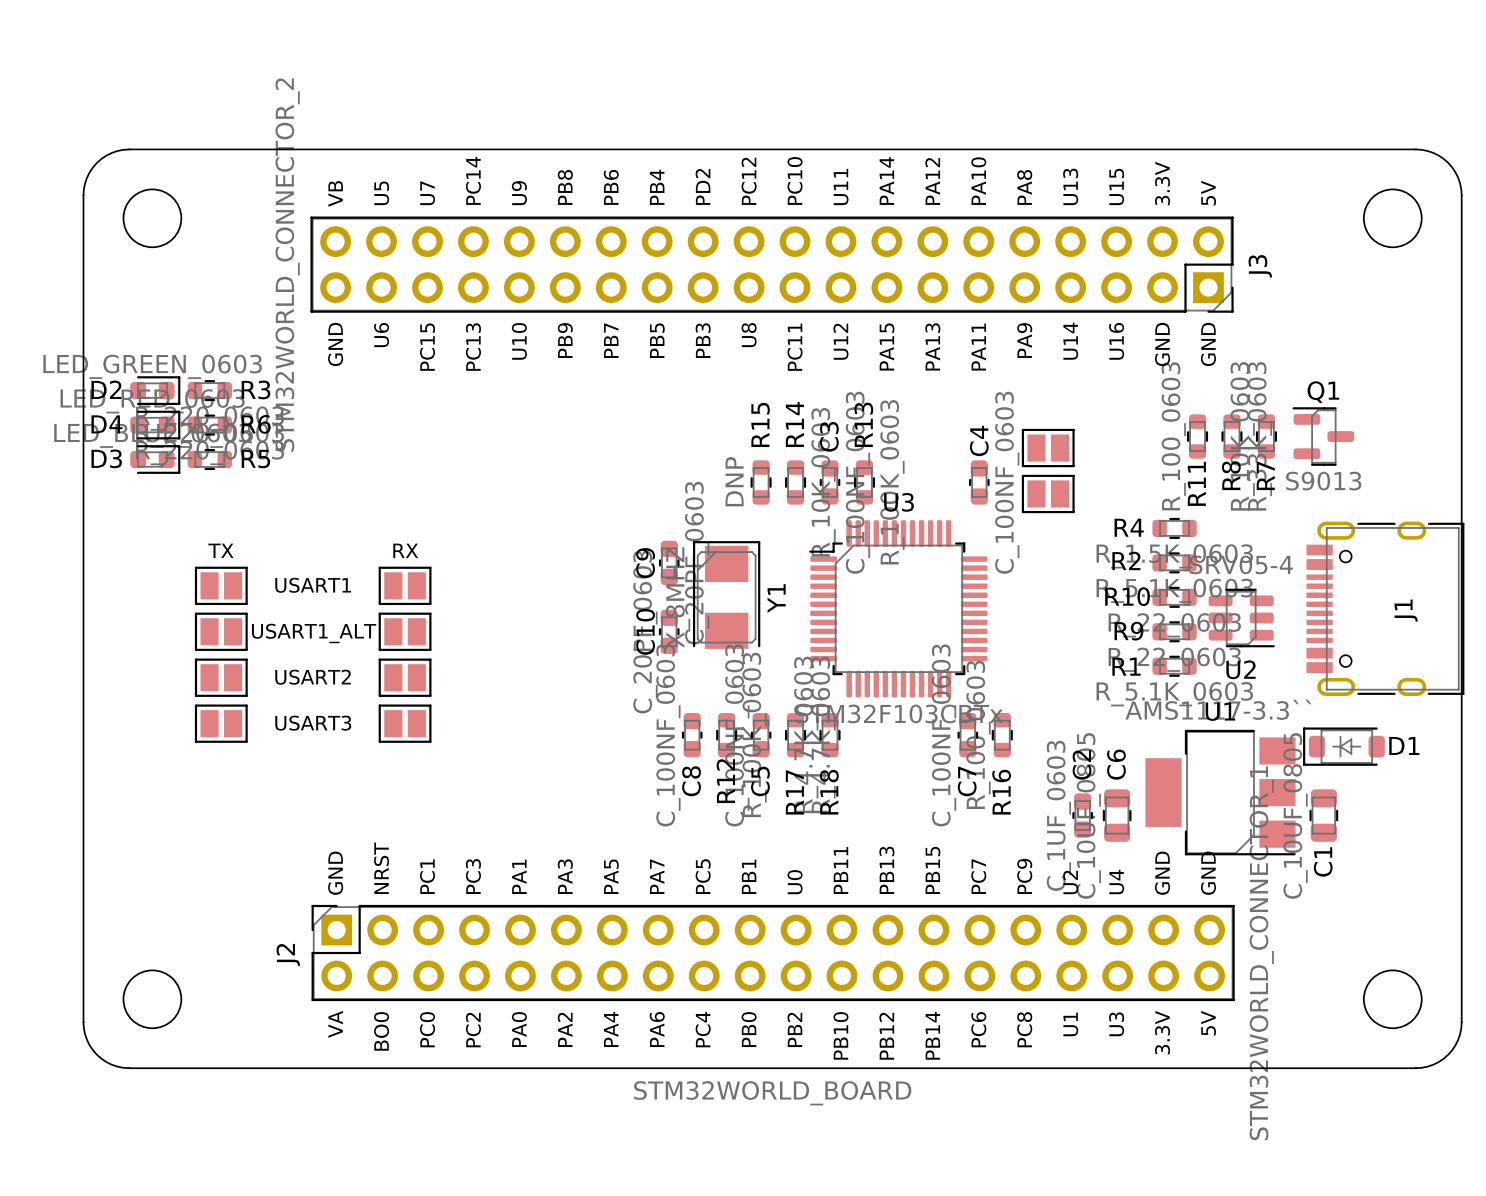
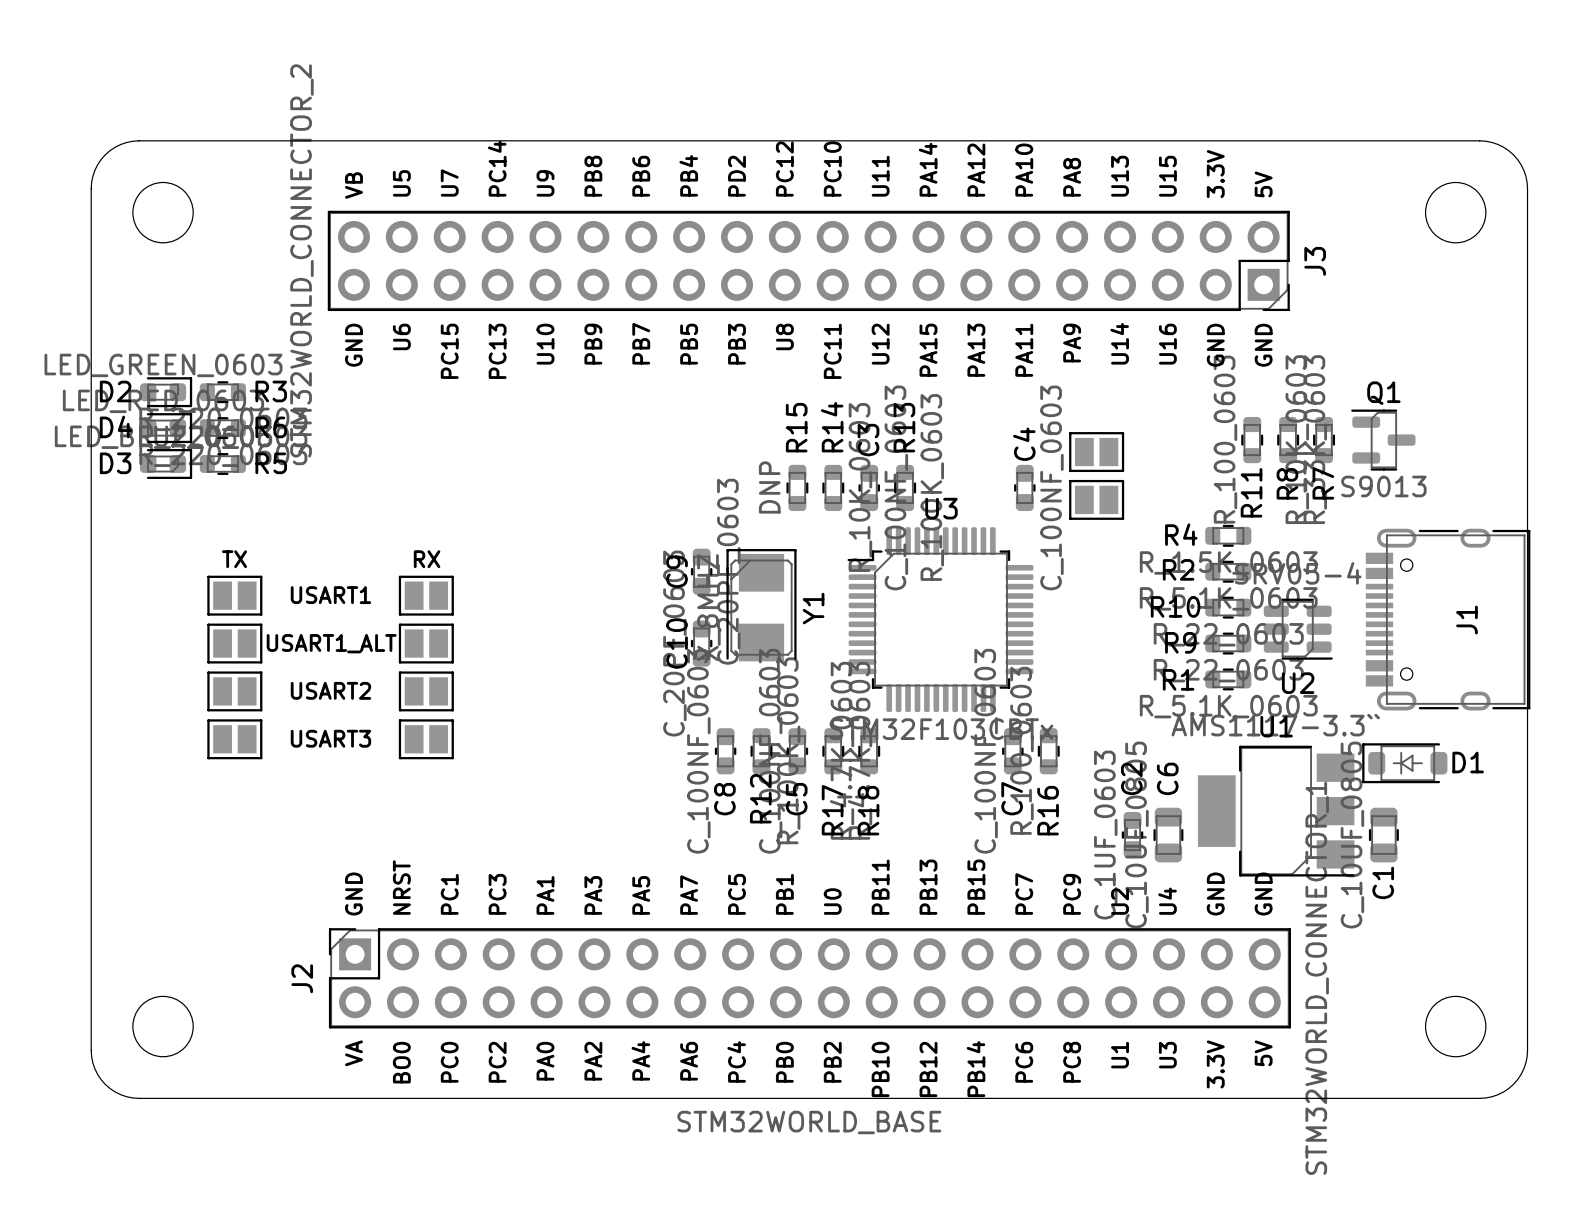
part value: STM32WORLD_BOARD (772, 1093) -> STM32WORLD_BASE (809, 1122)

